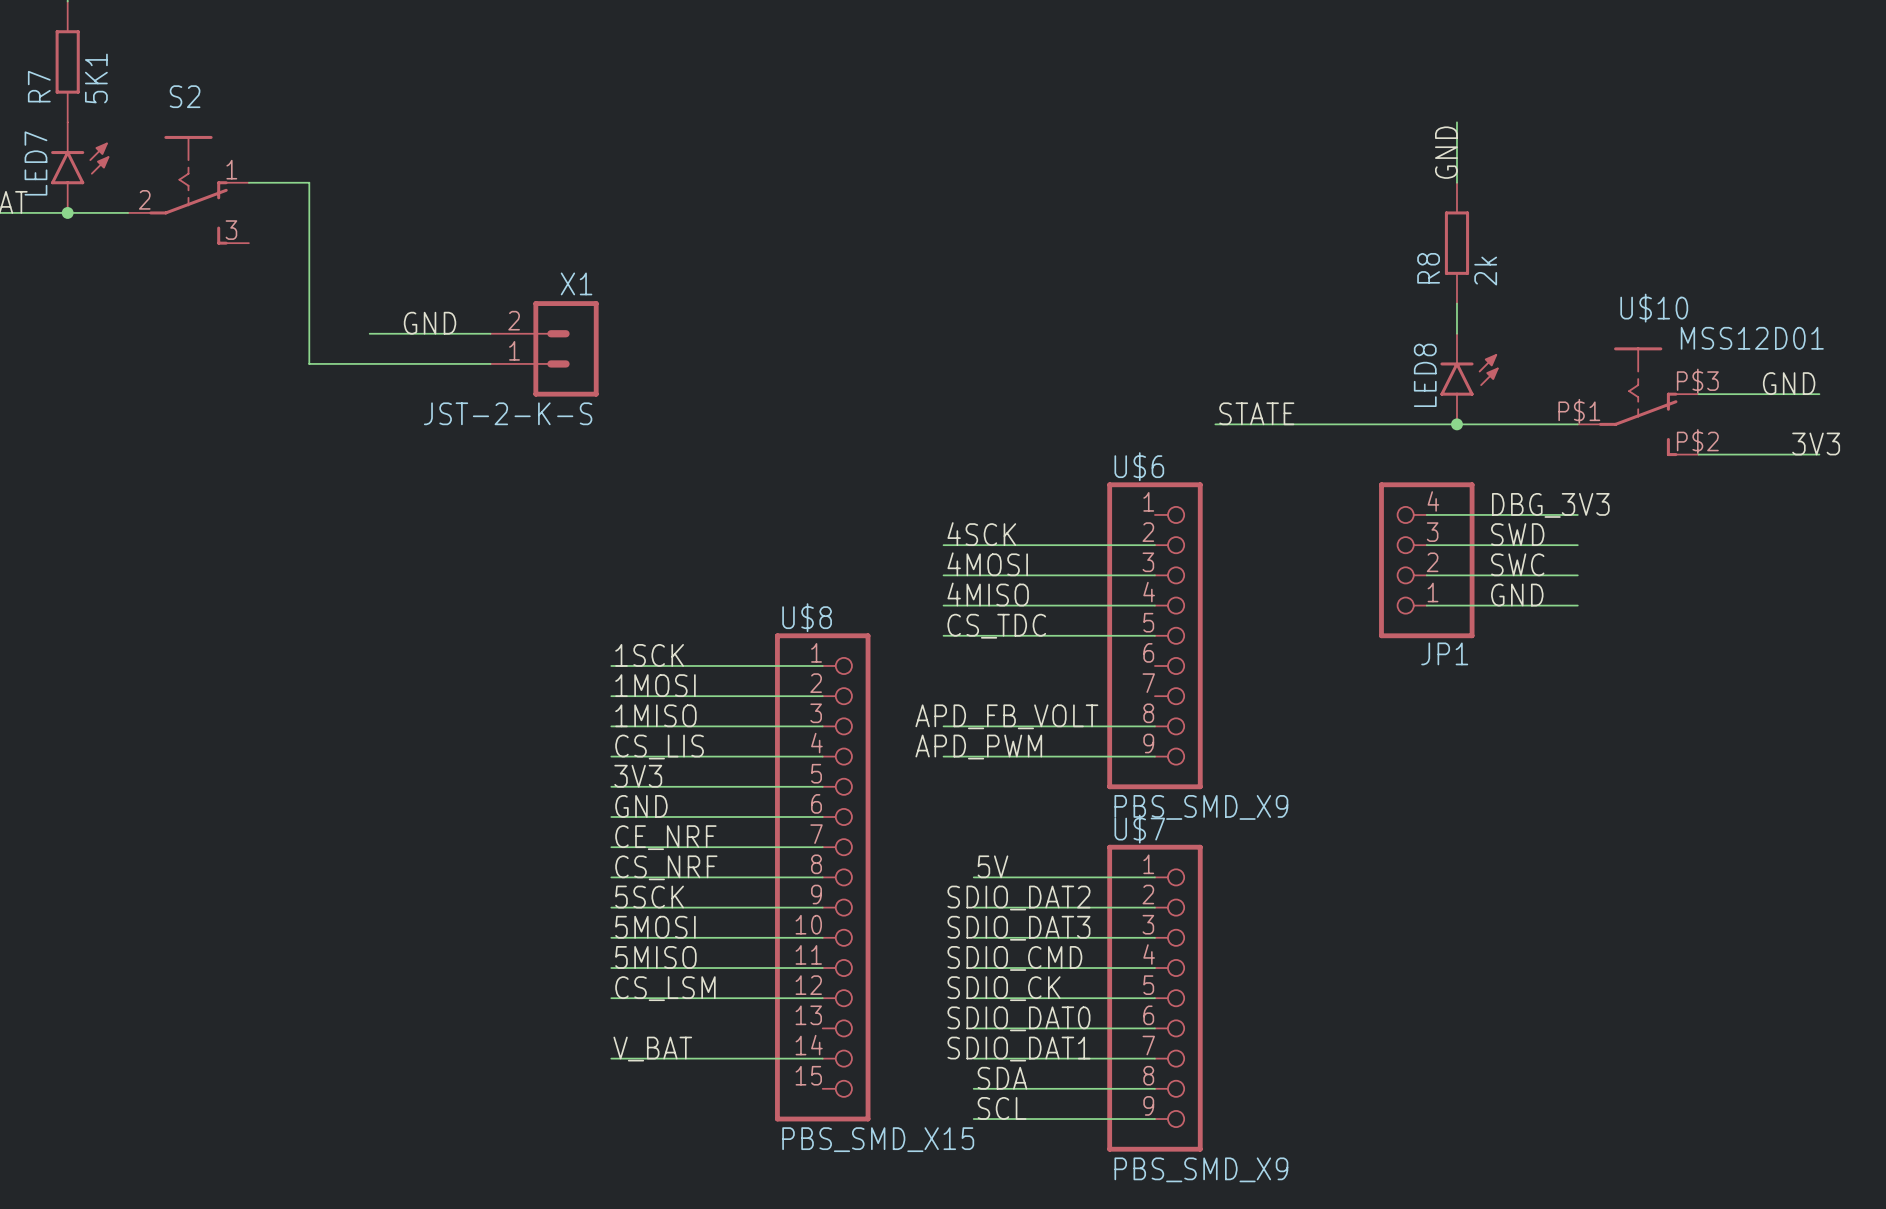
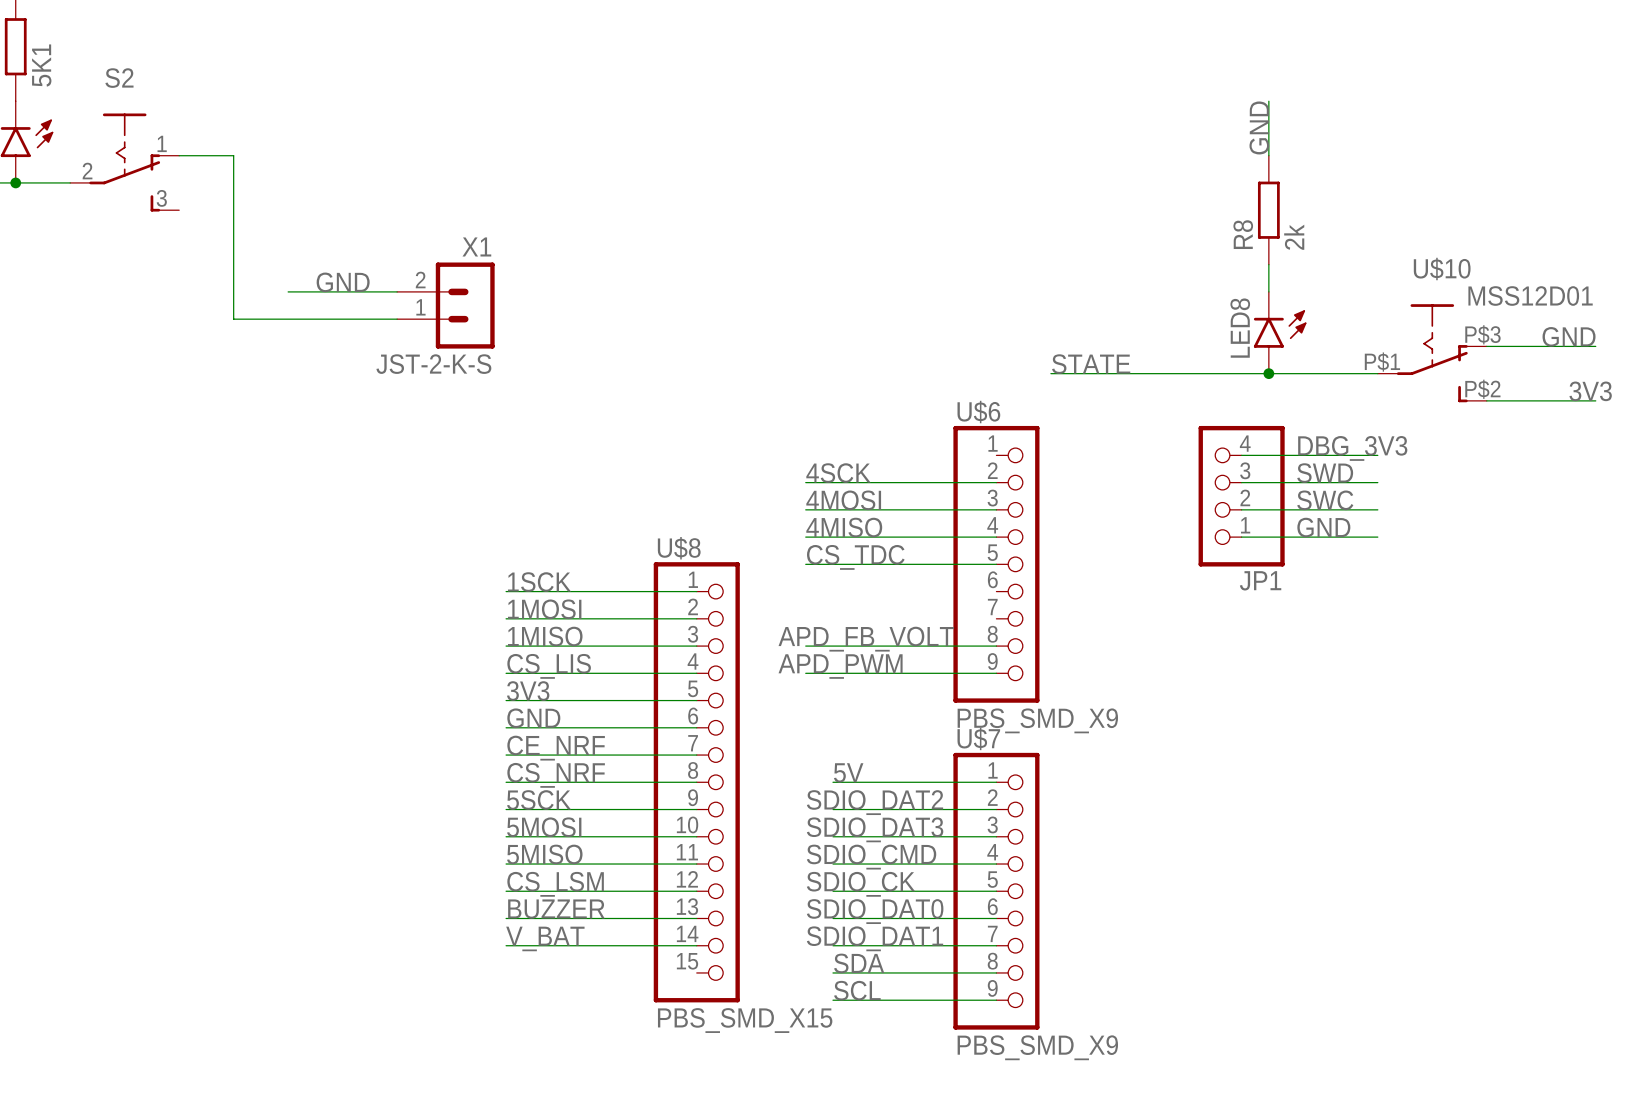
label: none -> BUZZER (556, 909)
wire: none -> (506, 918) (696, 918)

